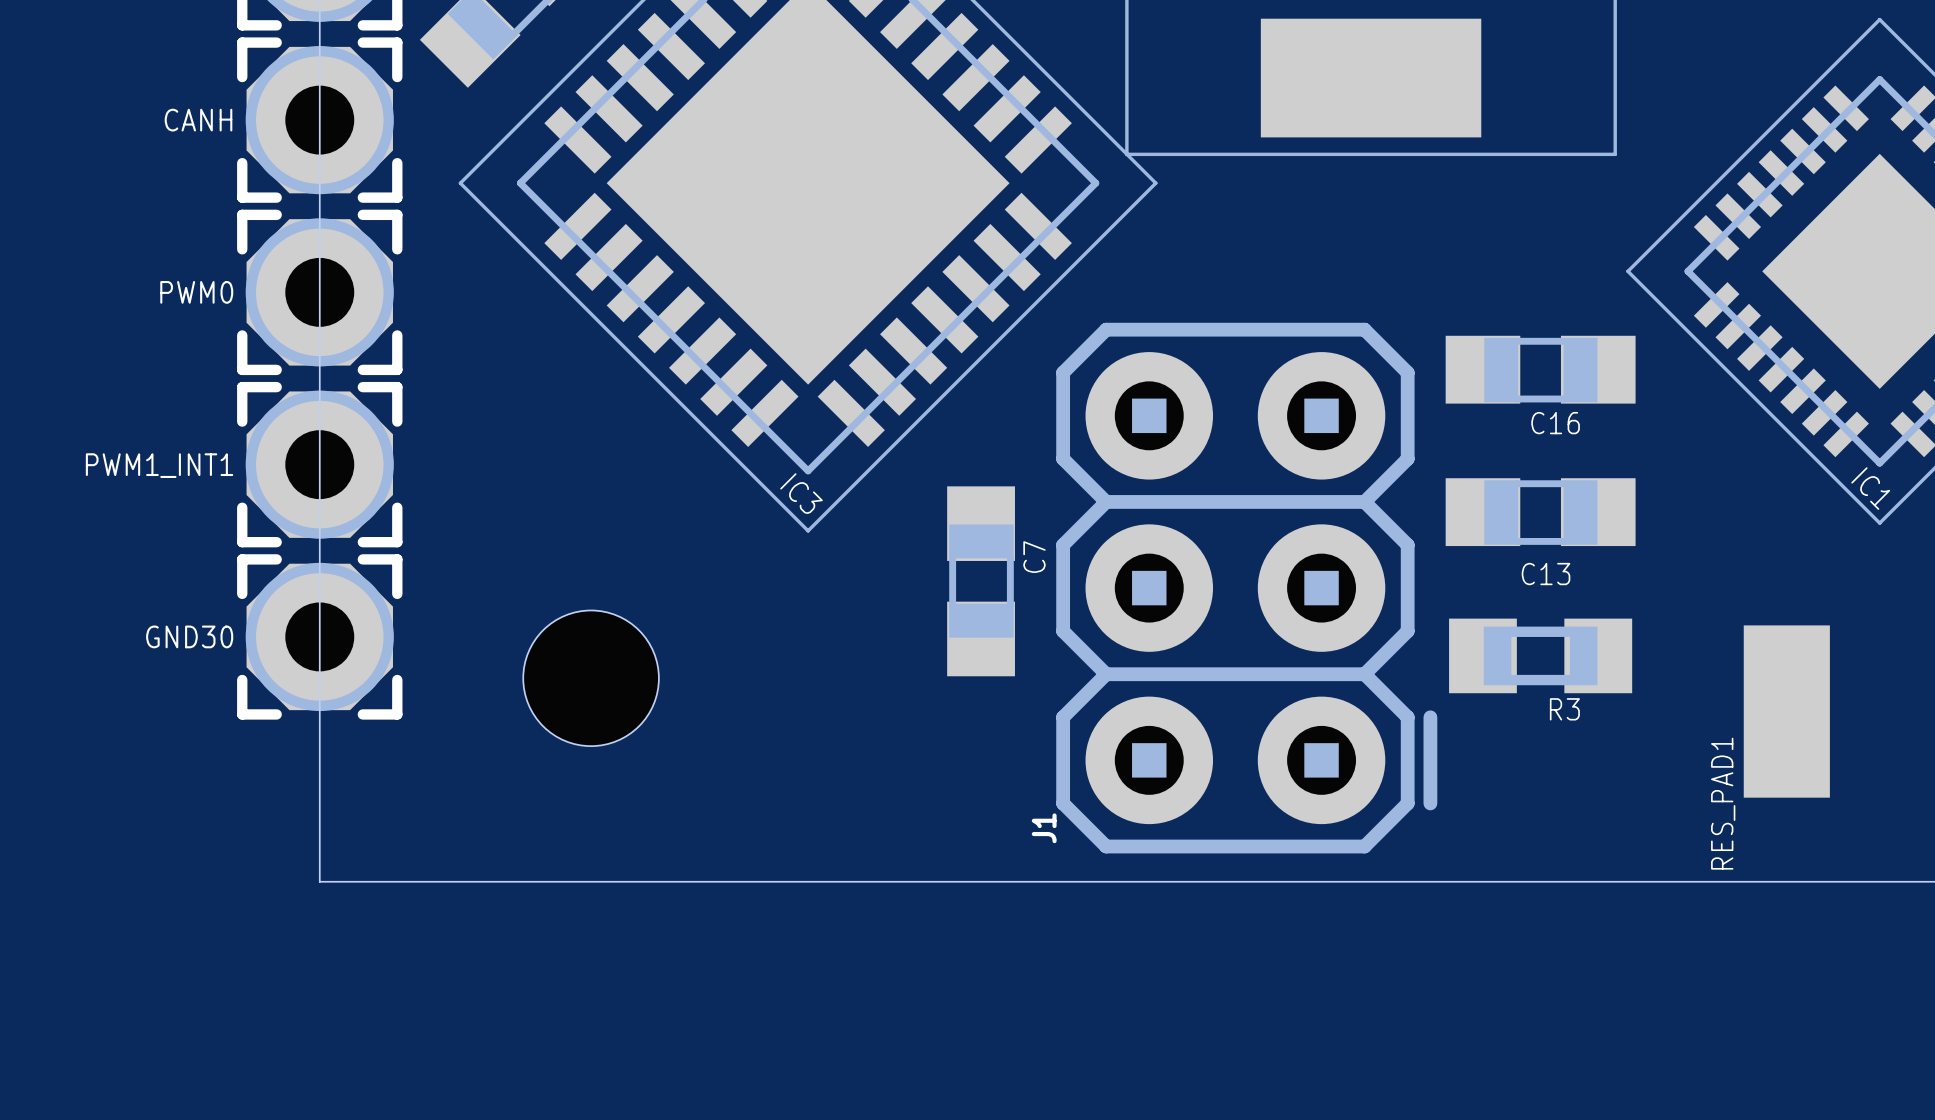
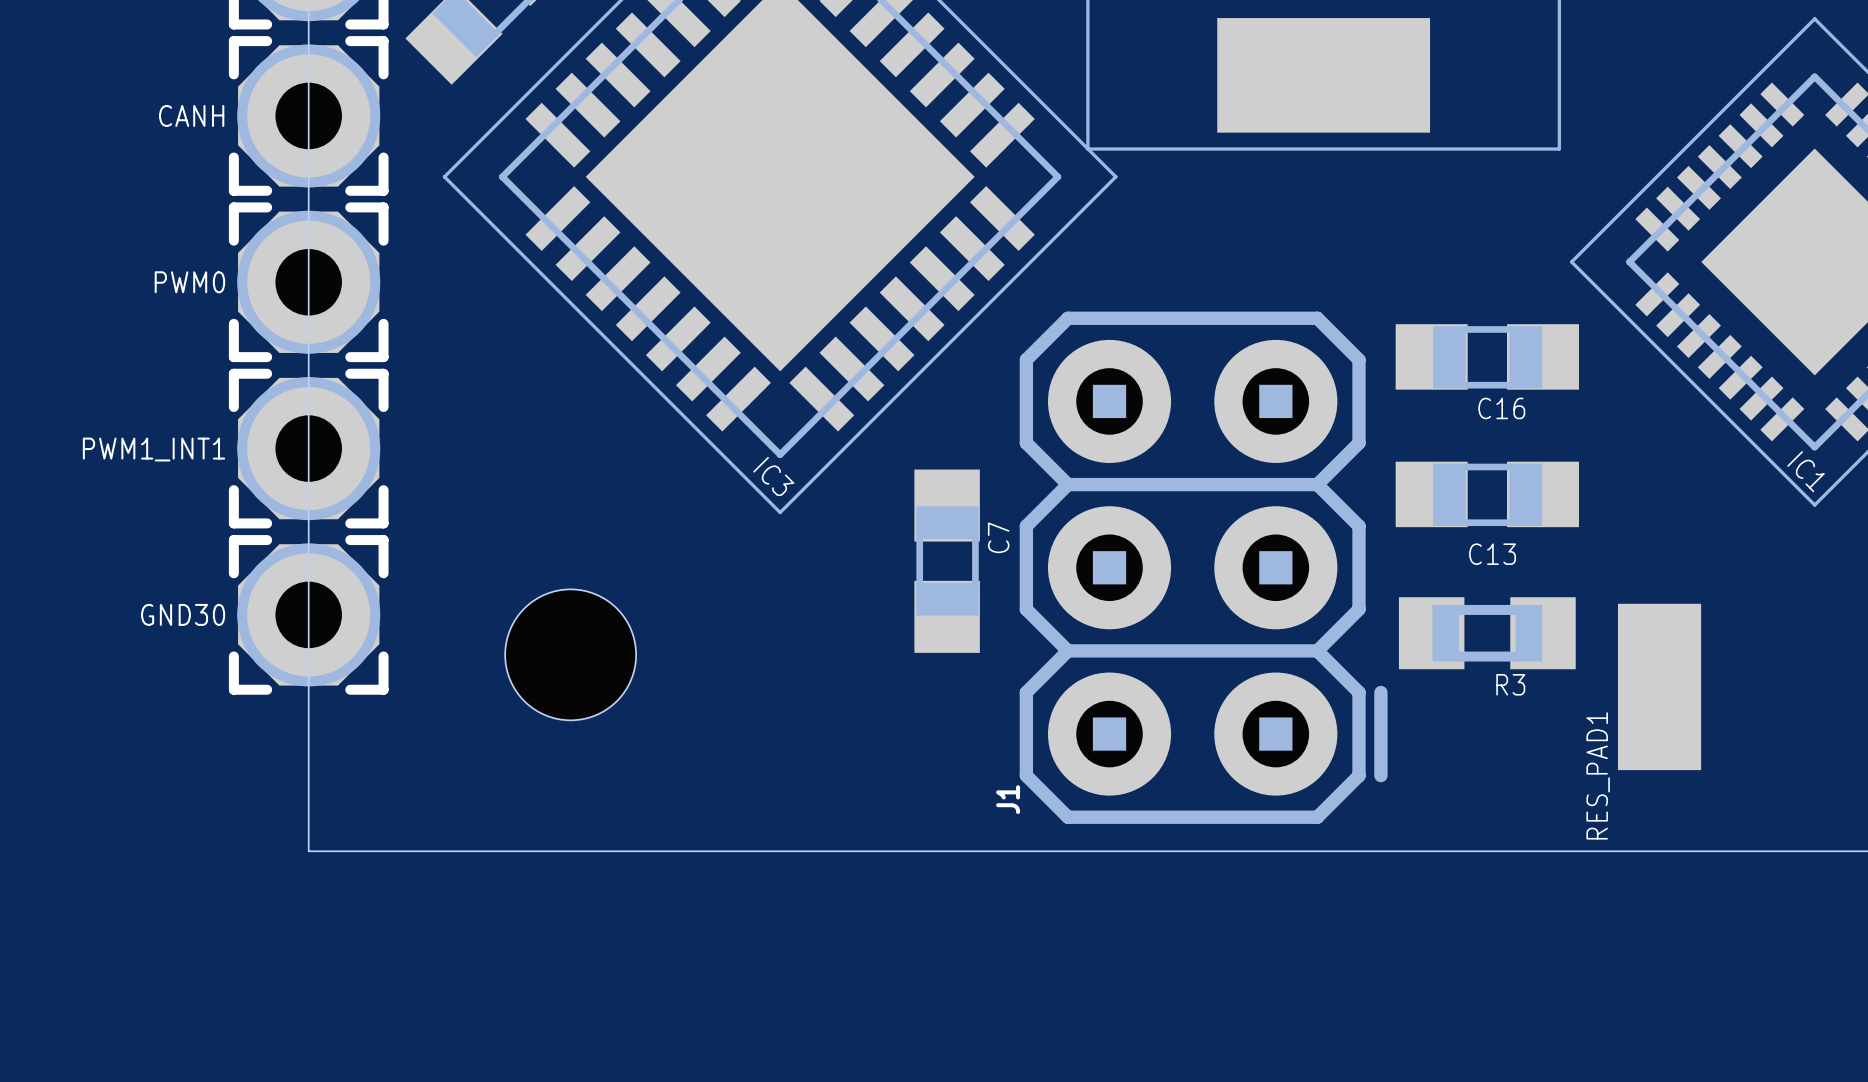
RES_PAD1 position: (1786, 711) -> (1659, 686)

